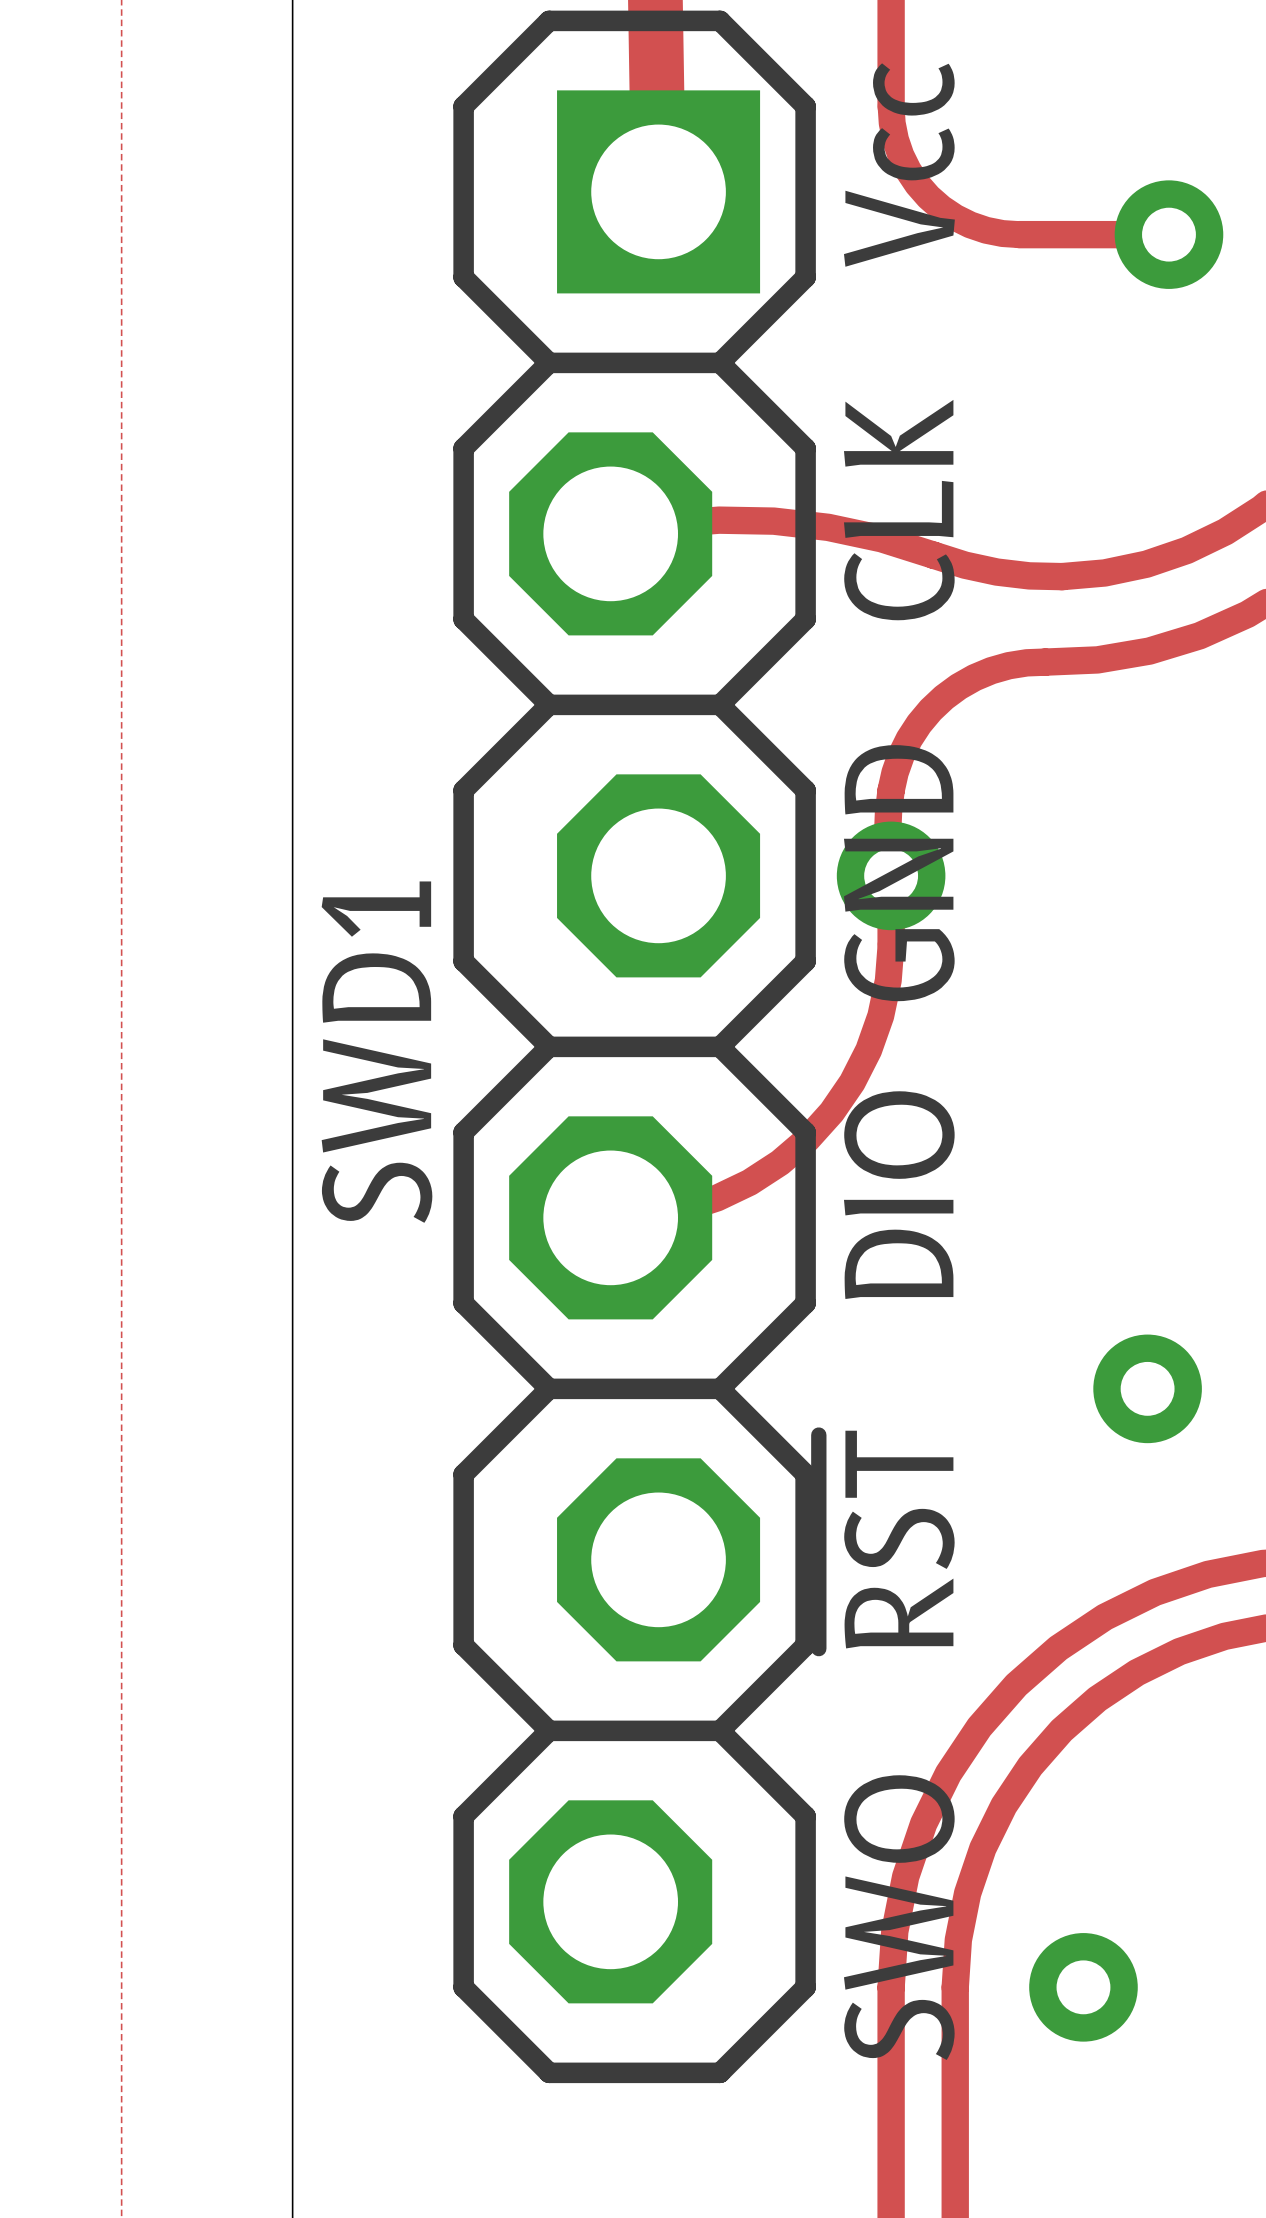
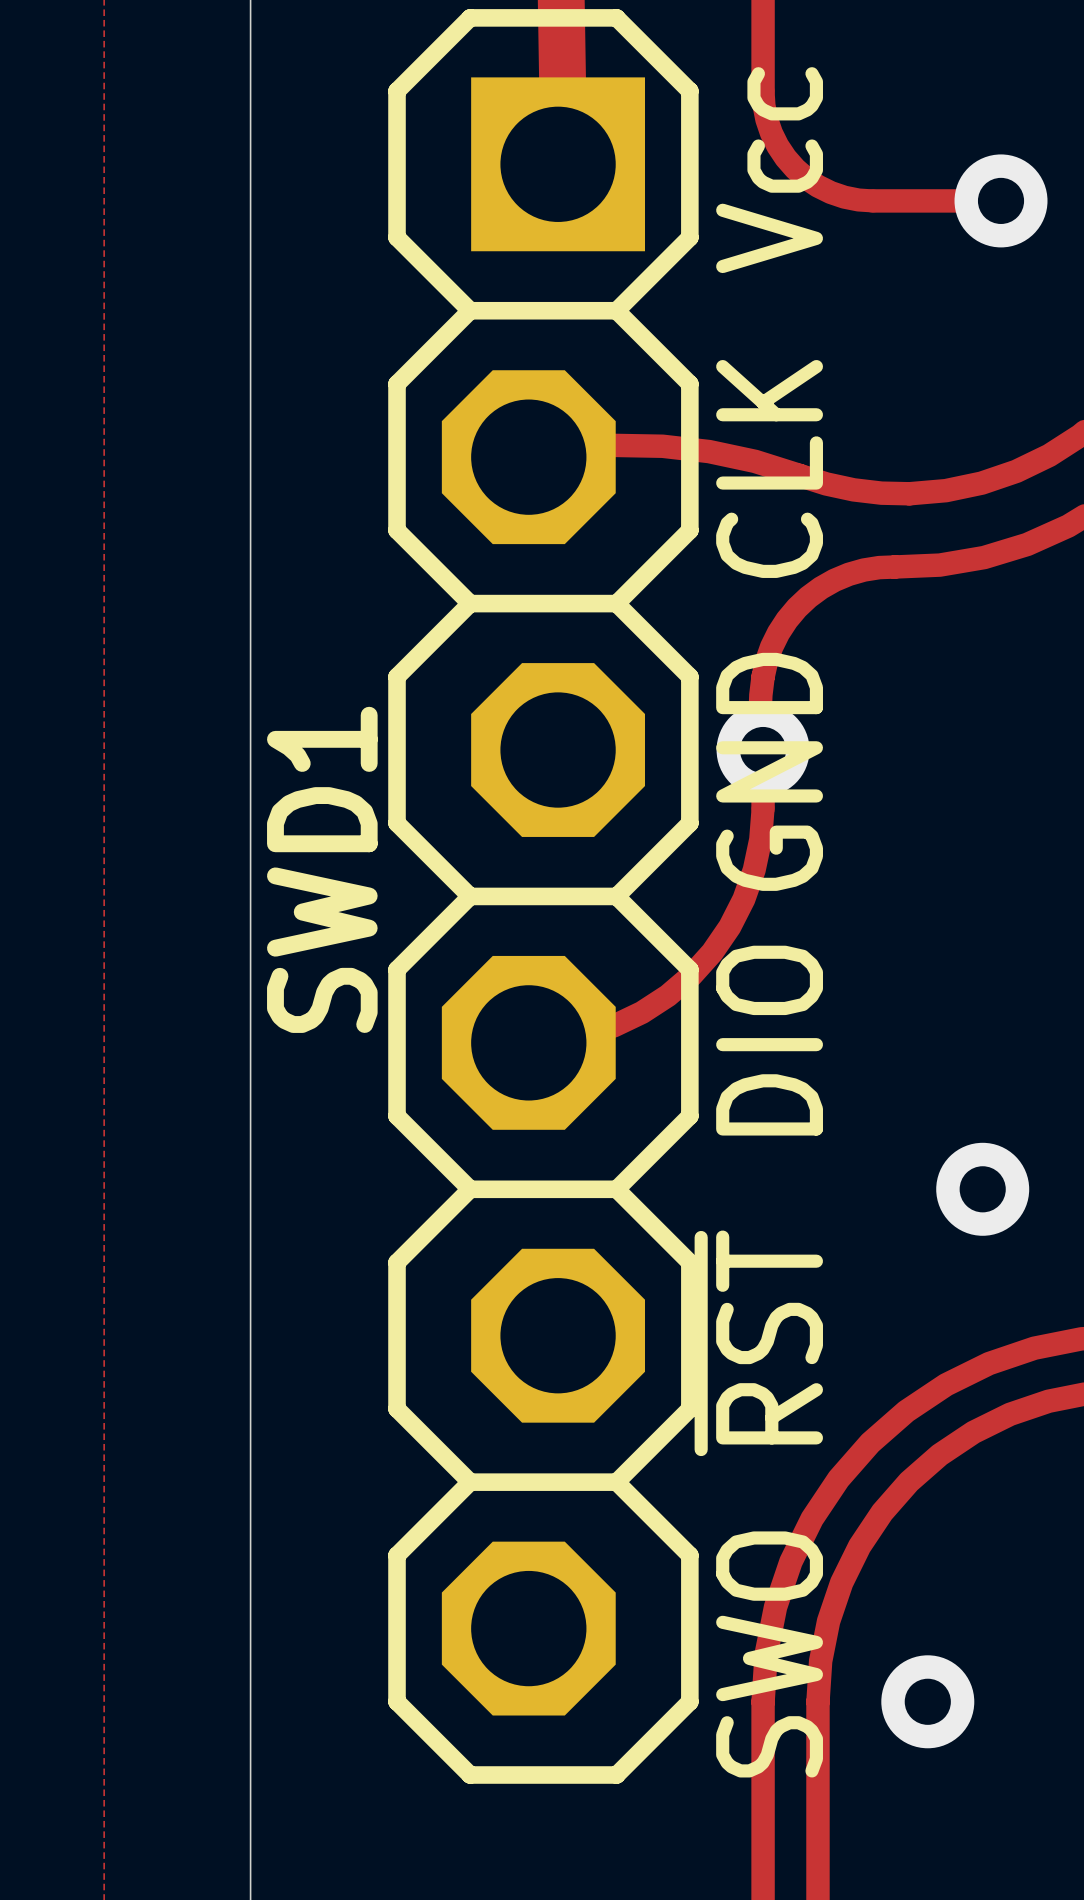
SWD1 footprint: [453, 10, 816, 2084] -> [388, 9, 699, 1784]

